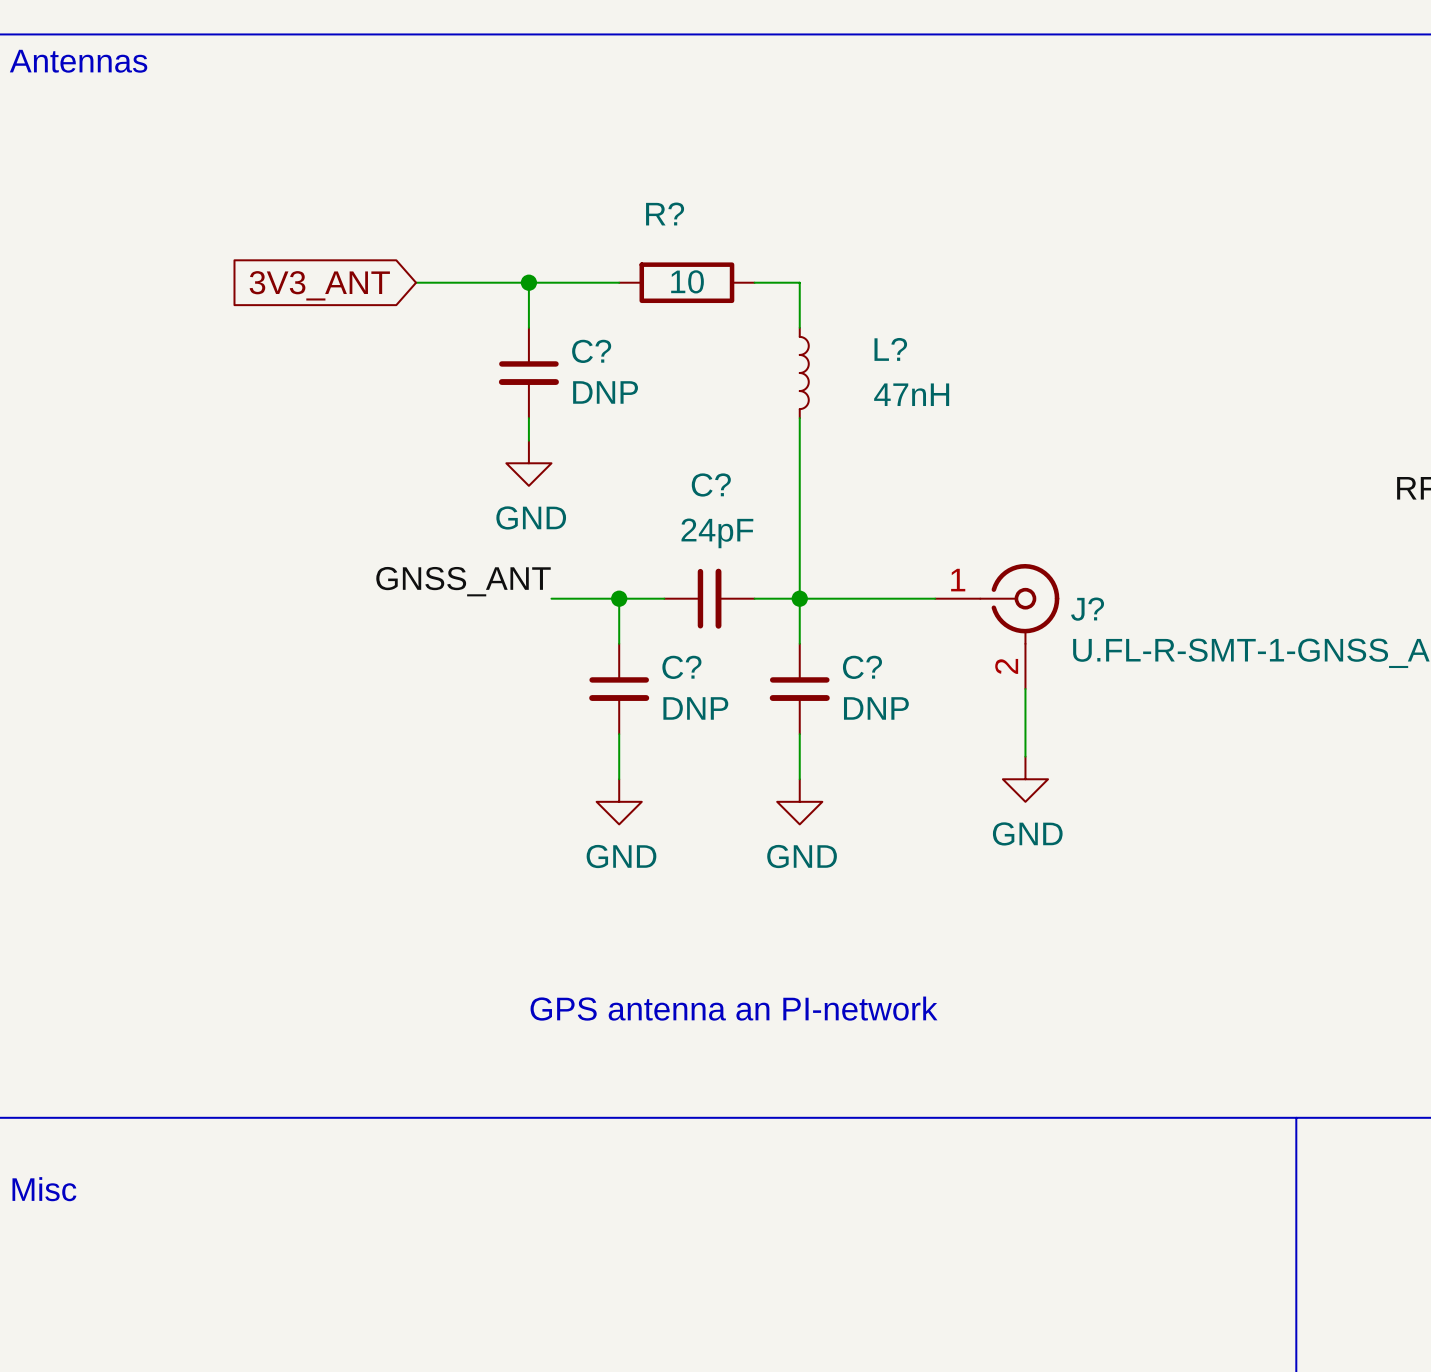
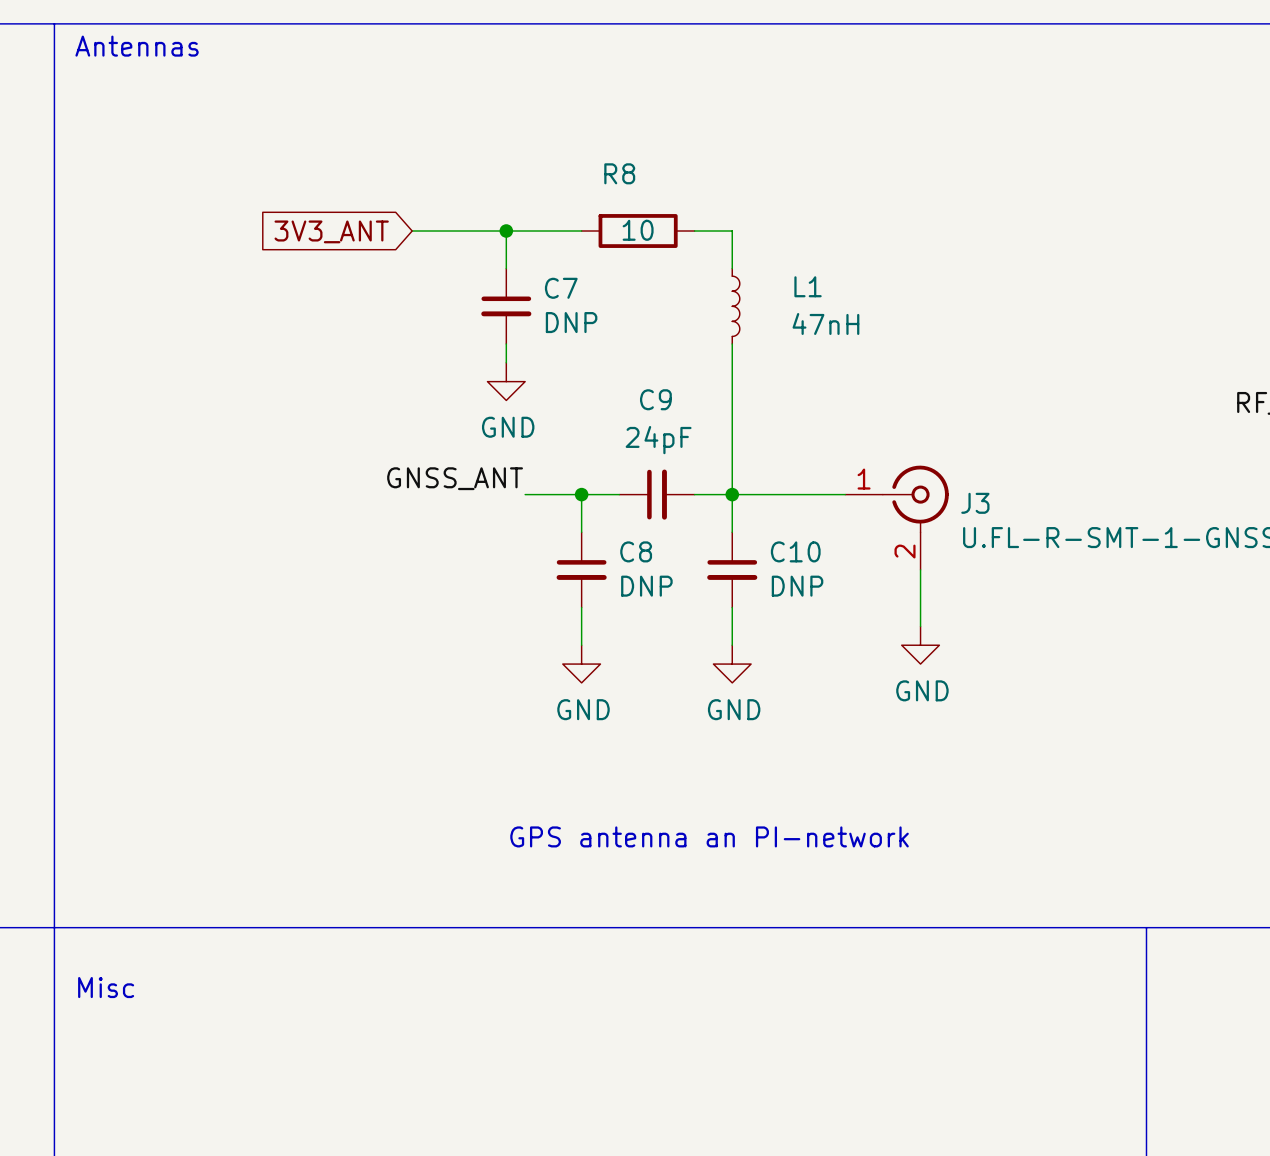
R? name: R? (665, 213) -> R8 (619, 173)
L? name: L? (890, 349) -> L1 (808, 286)
C? name: C? (591, 351) -> C7 (561, 288)
C? name: C? (711, 484) -> C9 (655, 399)
J? name: J? (1087, 609) -> J3 (975, 503)
C? name: C? (681, 667) -> C8 (636, 551)
C? name: C? (862, 667) -> C10 (795, 551)

